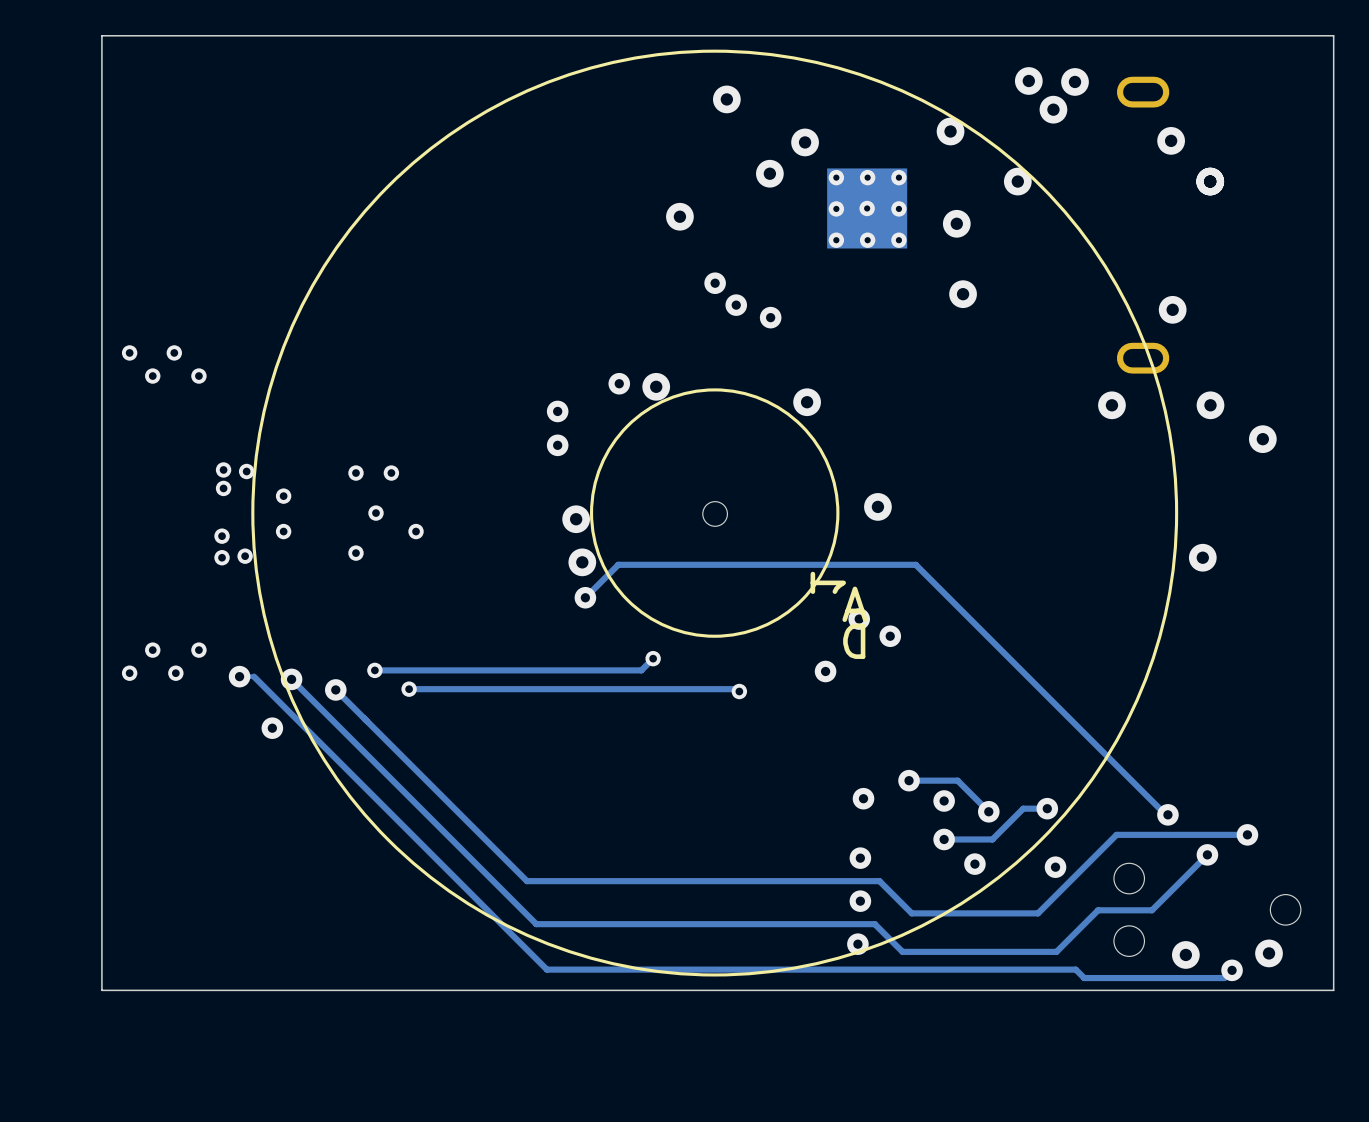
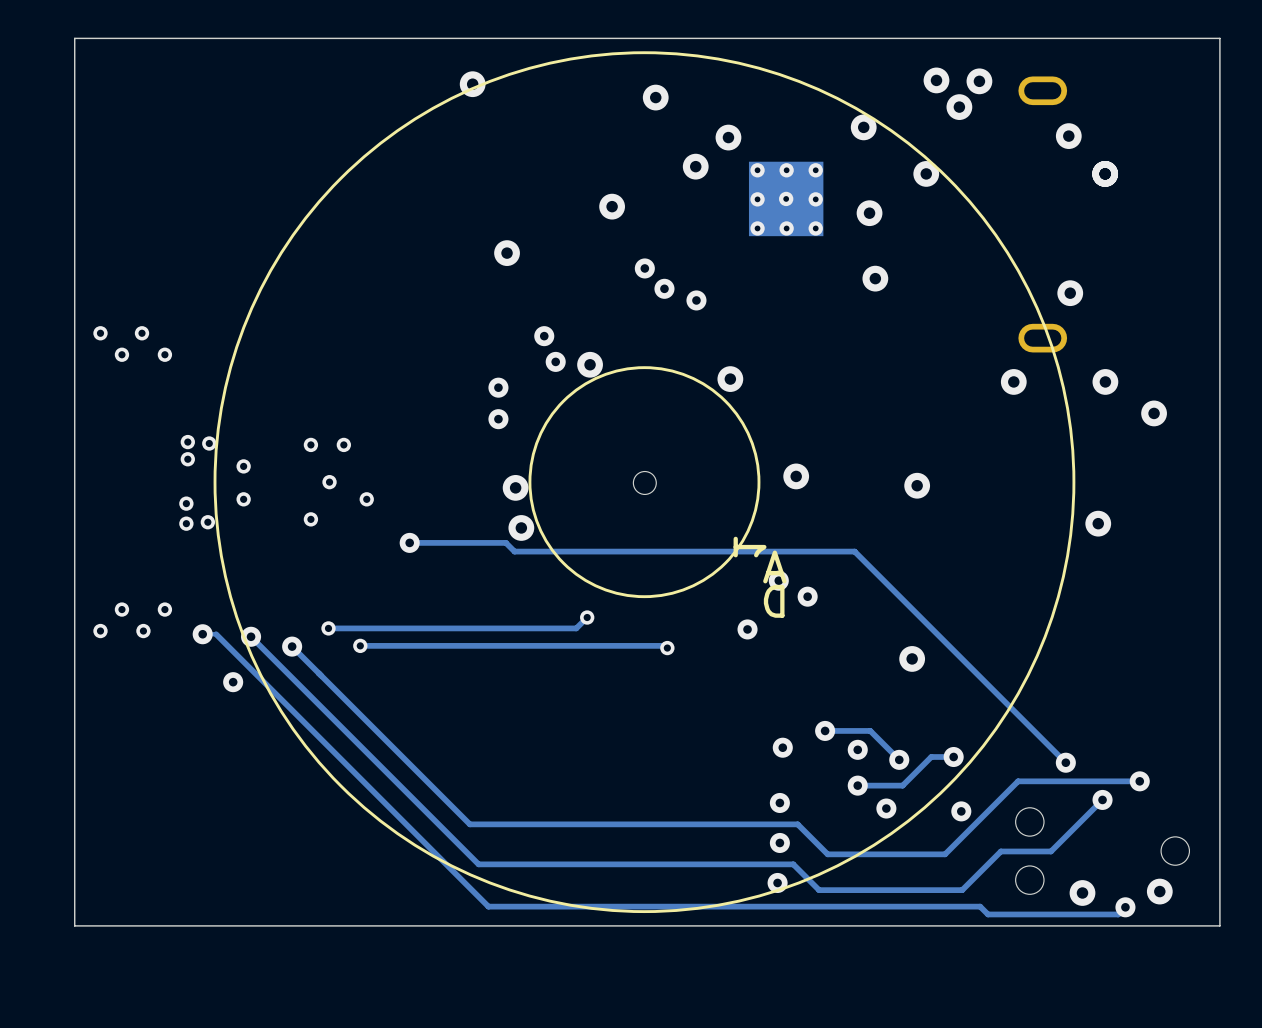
via: none -> (472, 84)
via: none -> (507, 253)
via: none -> (544, 336)
via: none -> (917, 485)
via: none -> (409, 542)
track: (585, 597) (618, 564) (915, 564) (1167, 814) -> (409, 542) (505, 542) (514, 551) (854, 551) (1065, 762)
via: (585, 597) -> none
via: none -> (912, 658)

